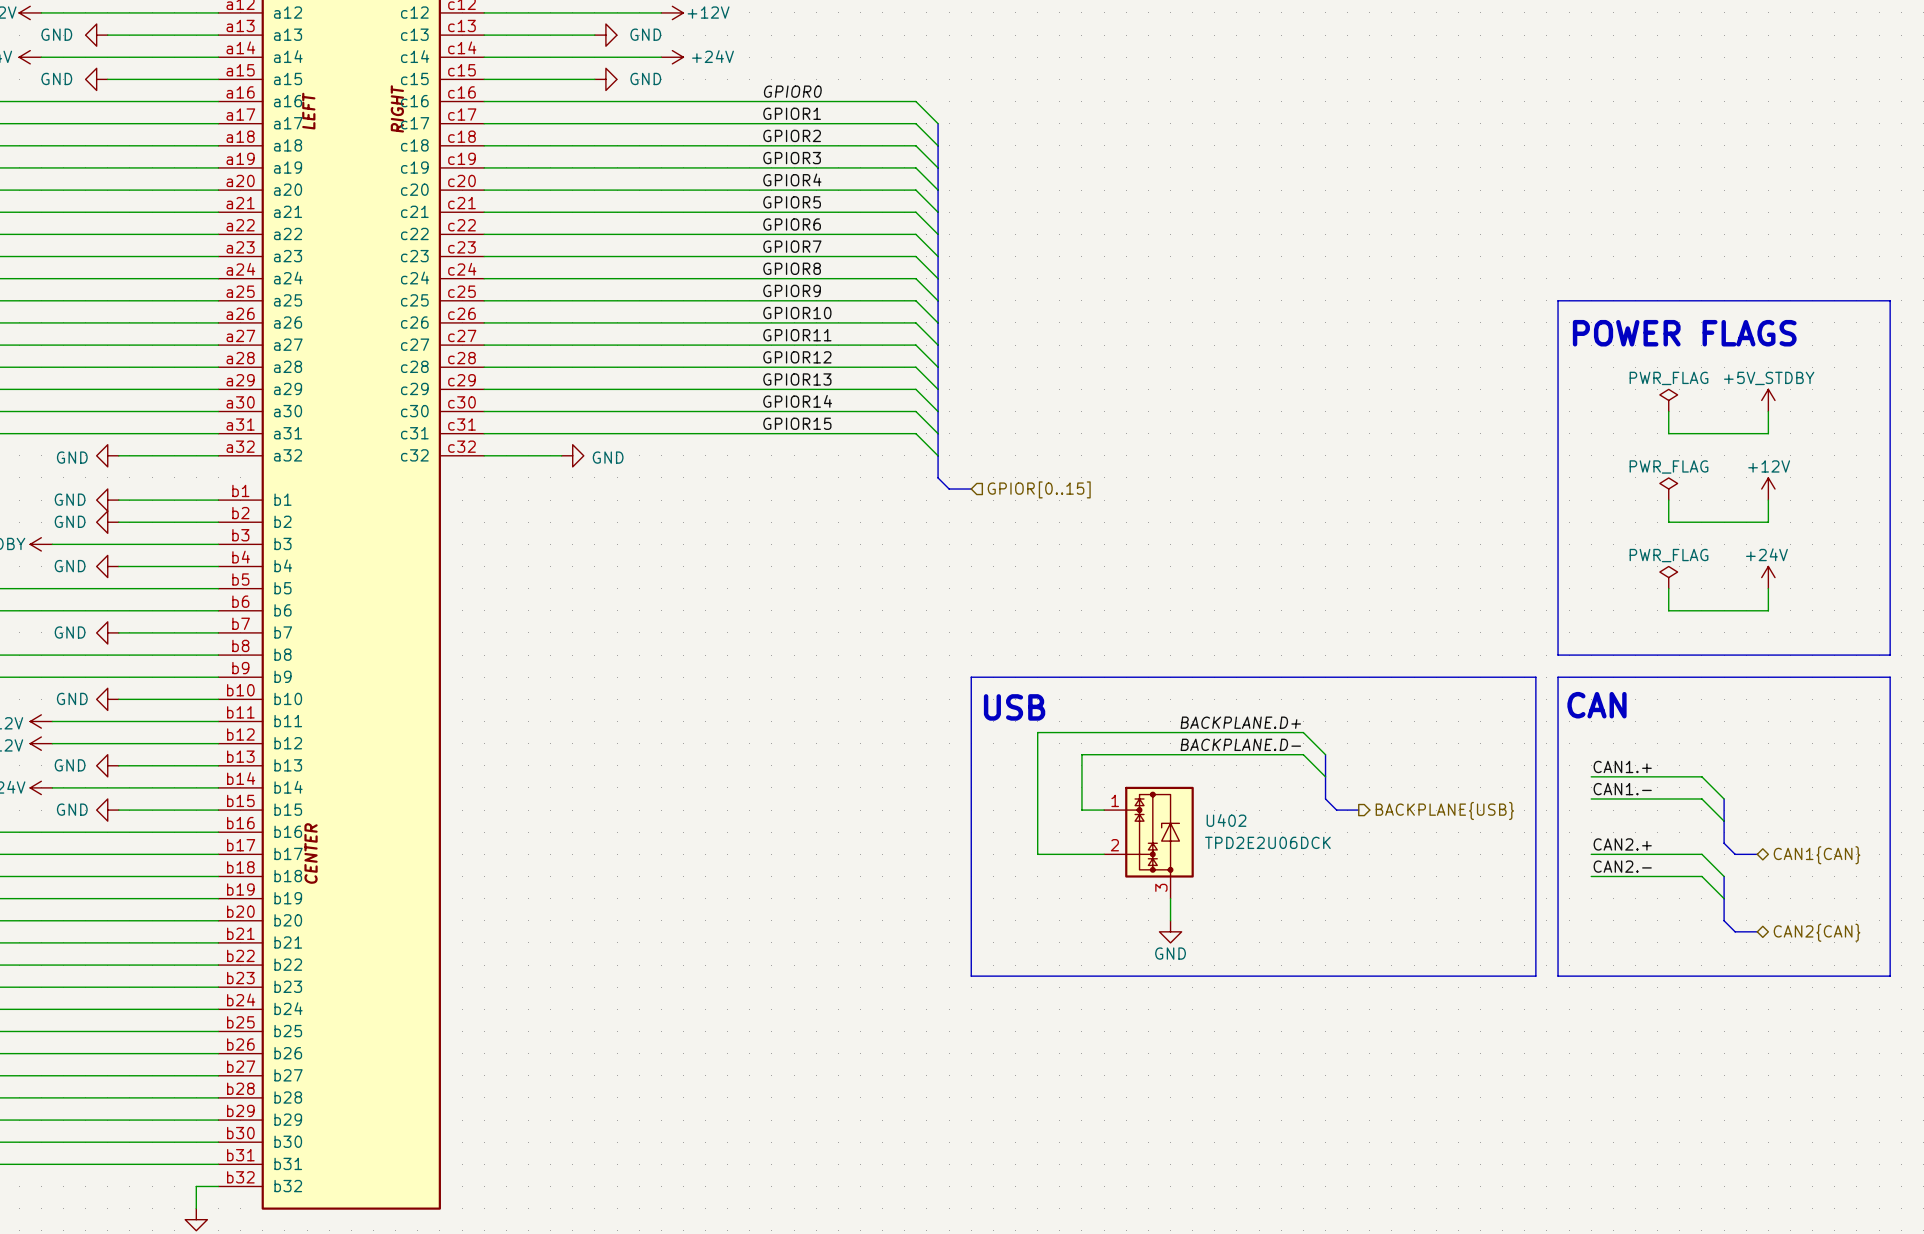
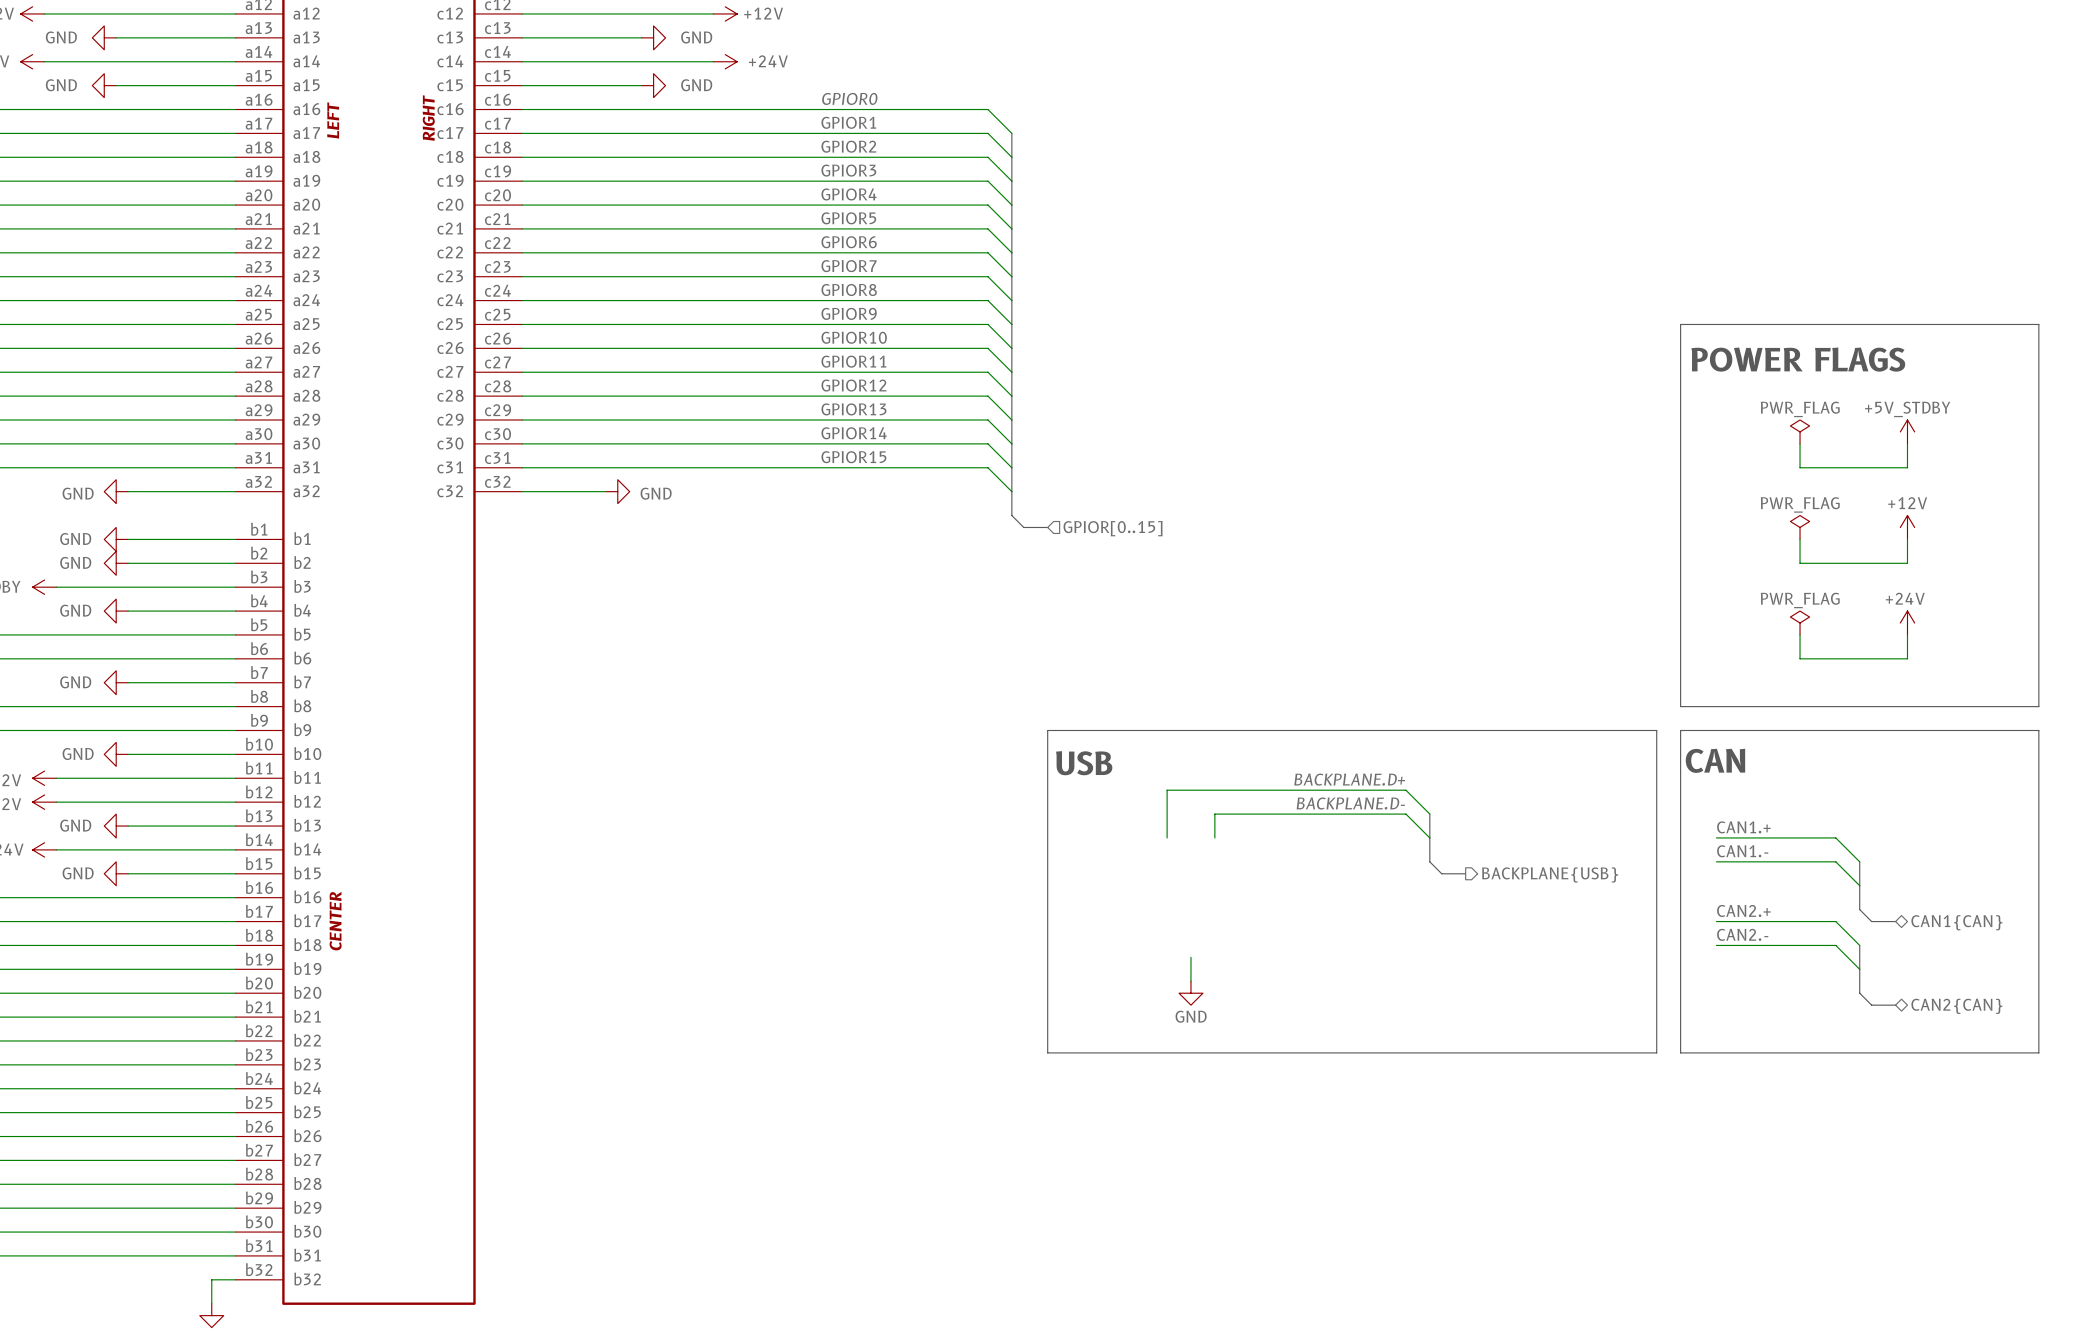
wire: (1081, 732) (1037, 732) (1037, 854) (1104, 854) -> none
wire: (1081, 754) (1126, 754) -> (1167, 814) (1167, 790)
wire: none -> (1214, 814) (1214, 837)
wire: (1081, 776) (1081, 810) (1104, 810) -> none
U402: TPD2E2U06DCK (1148, 842) -> none
wire: (1170, 898) (1170, 920) -> (1190, 957) (1190, 981)
power symbol position: GND (1170, 931) -> GND (1190, 993)

